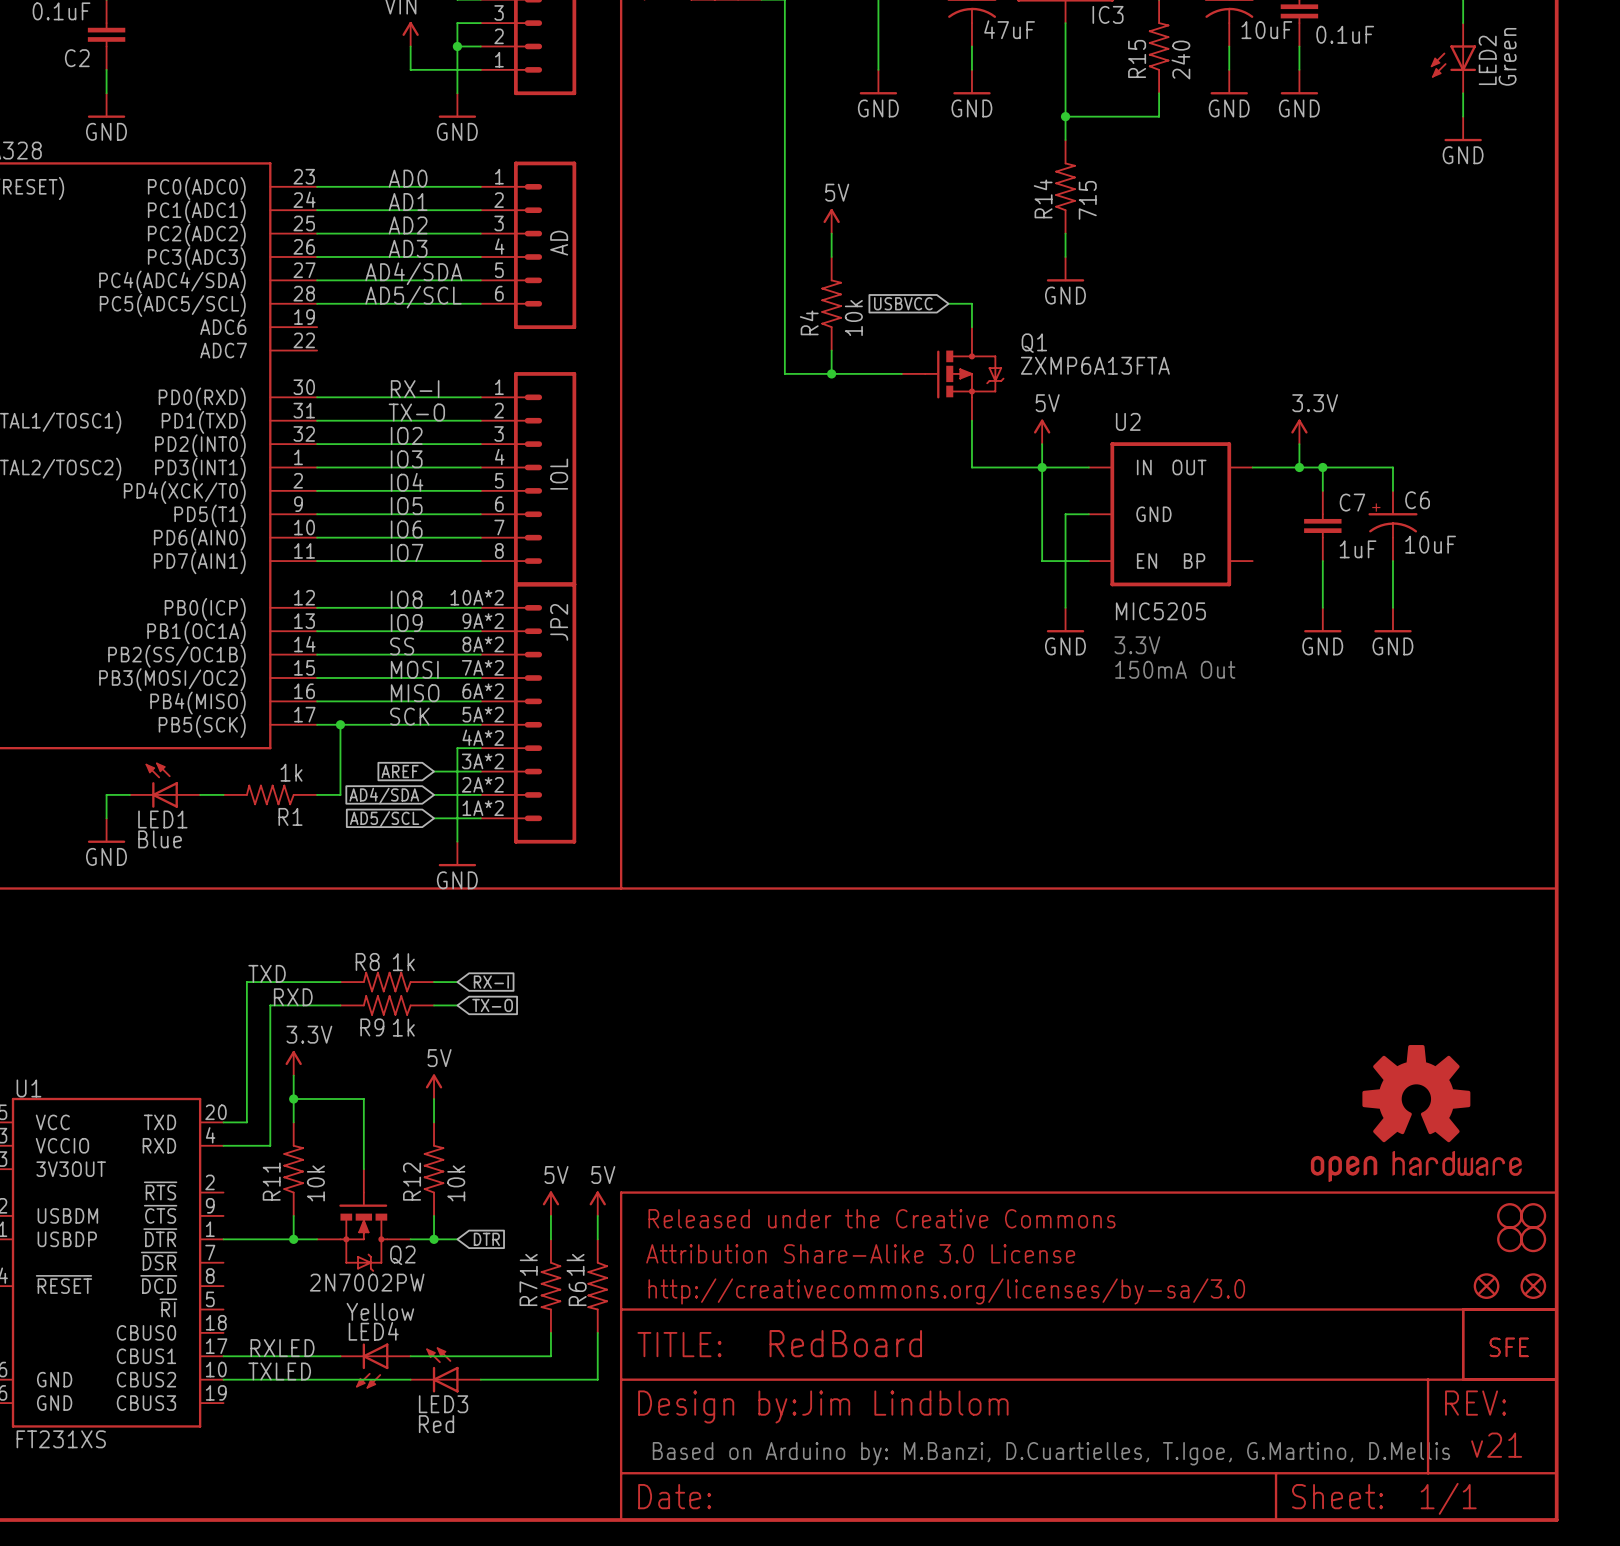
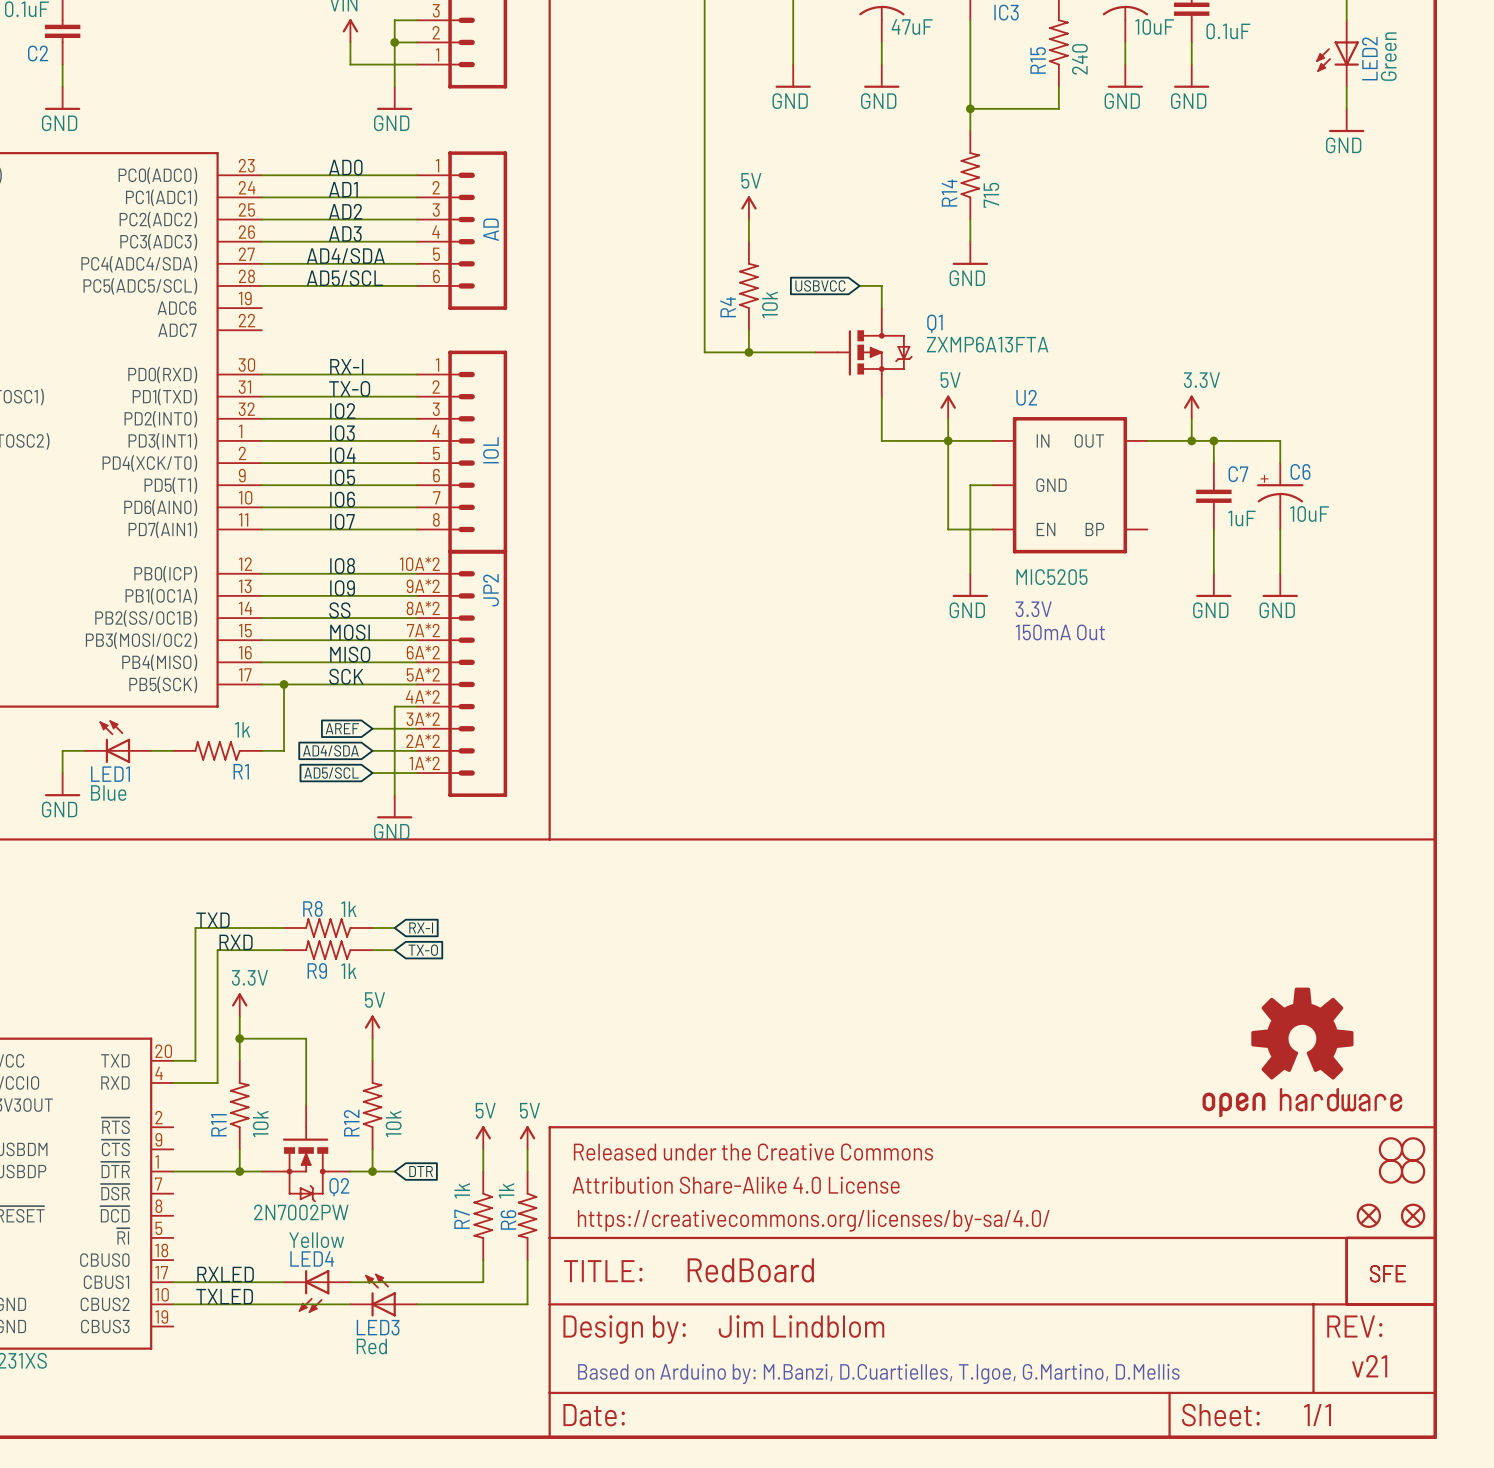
part text: Attribution Share-Alike 3.0 License (860, 1253) -> Attribution Share-Alike 4.0 License (736, 1185)
part text: http://creativecommons.org/licenses/by-sa/3.0 (946, 1291) -> https://creativecommons.org/licenses/by-sa/4.0/ (813, 1220)

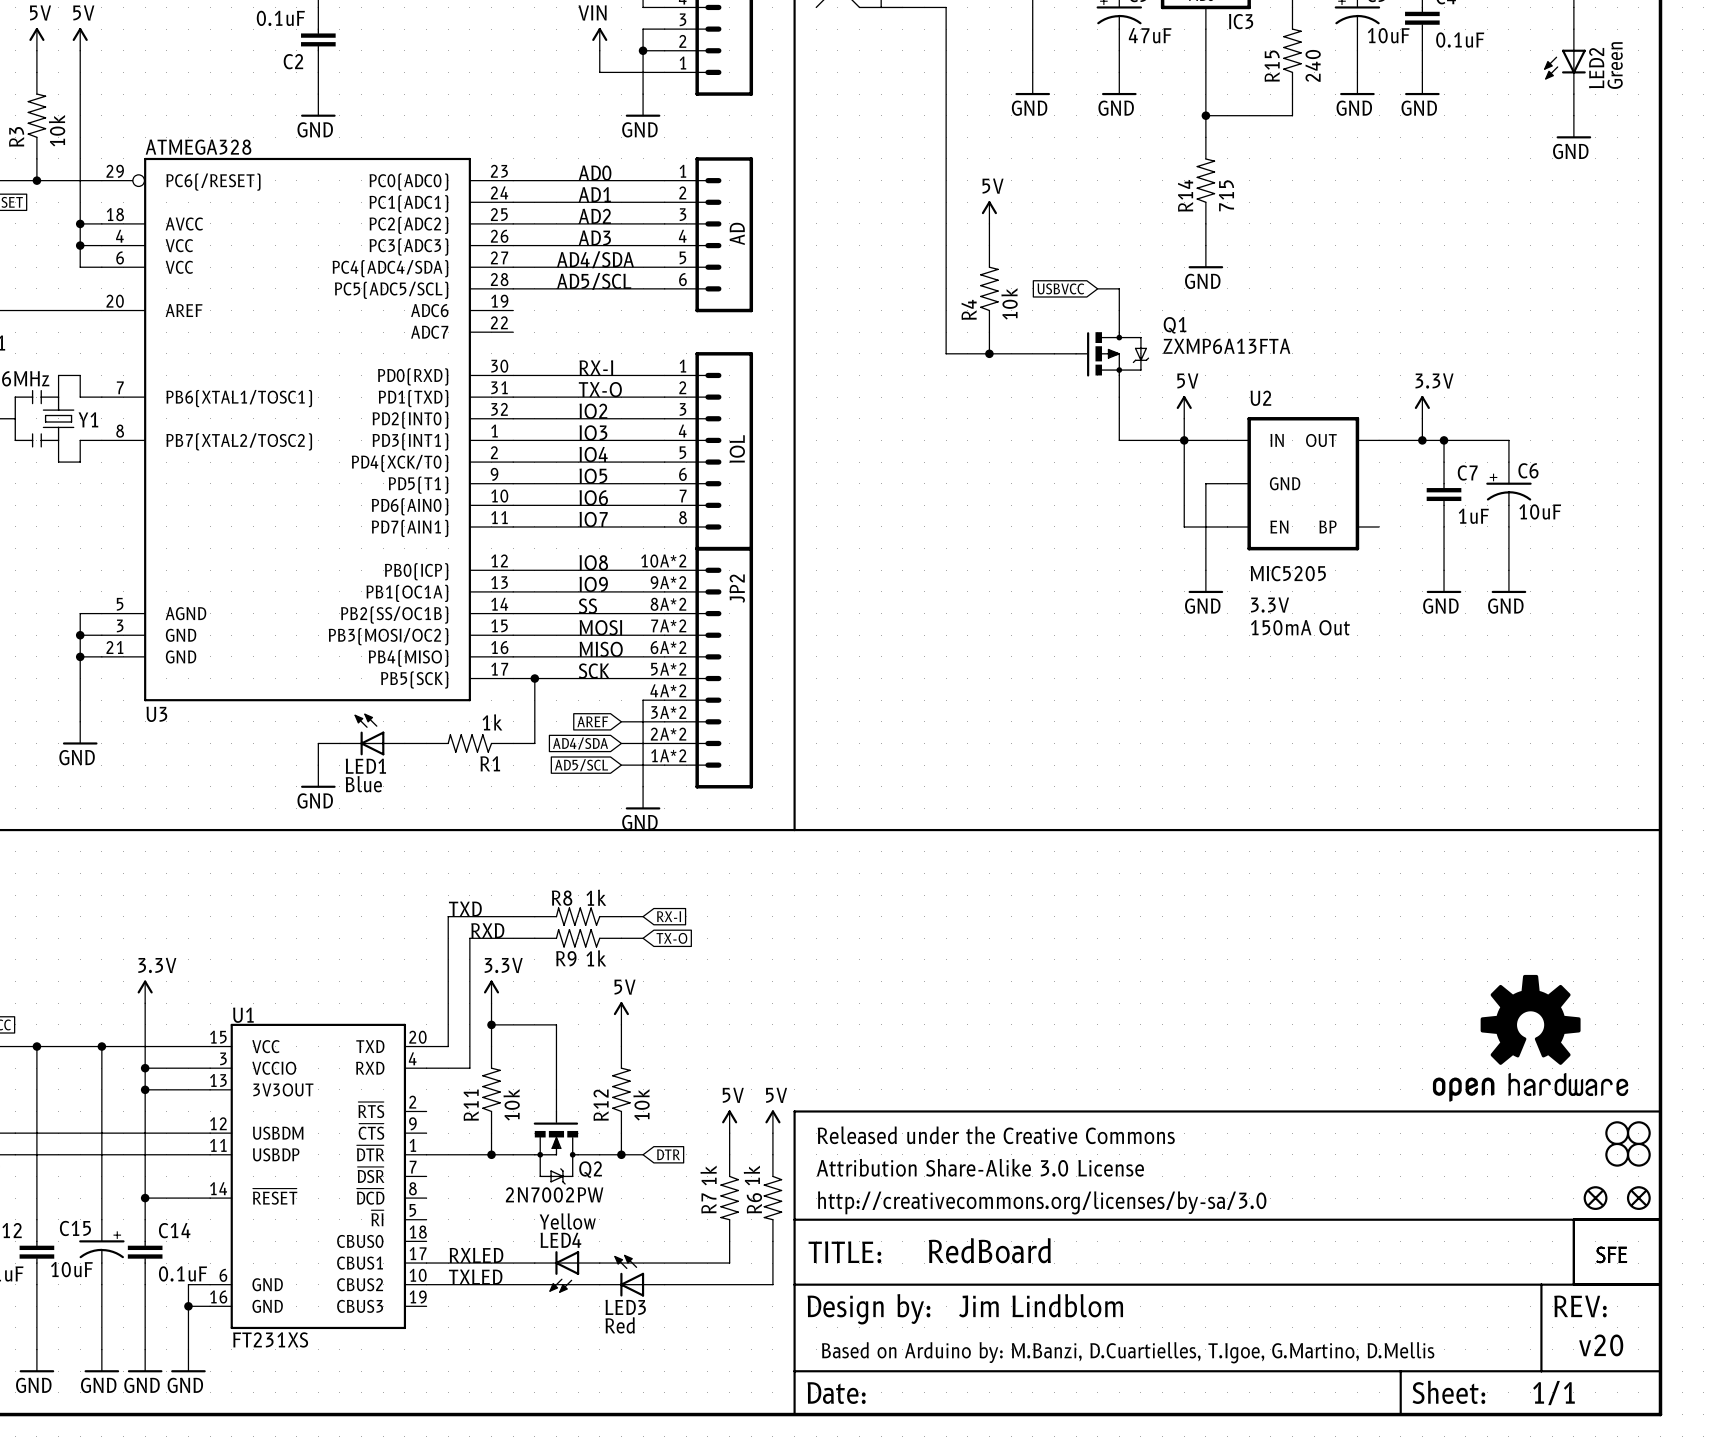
part text: Attribution Share-Alike 4.0 License (736, 1185) -> Attribution Share-Alike 3.0 License (980, 1167)
part text: https://creativecommons.org/licenses/by-sa/4.0/ (813, 1220) -> http://creativecommons.org/licenses/by-sa/3.0 (1042, 1202)
text: v21 (1369, 1366) -> v20 (1601, 1345)

